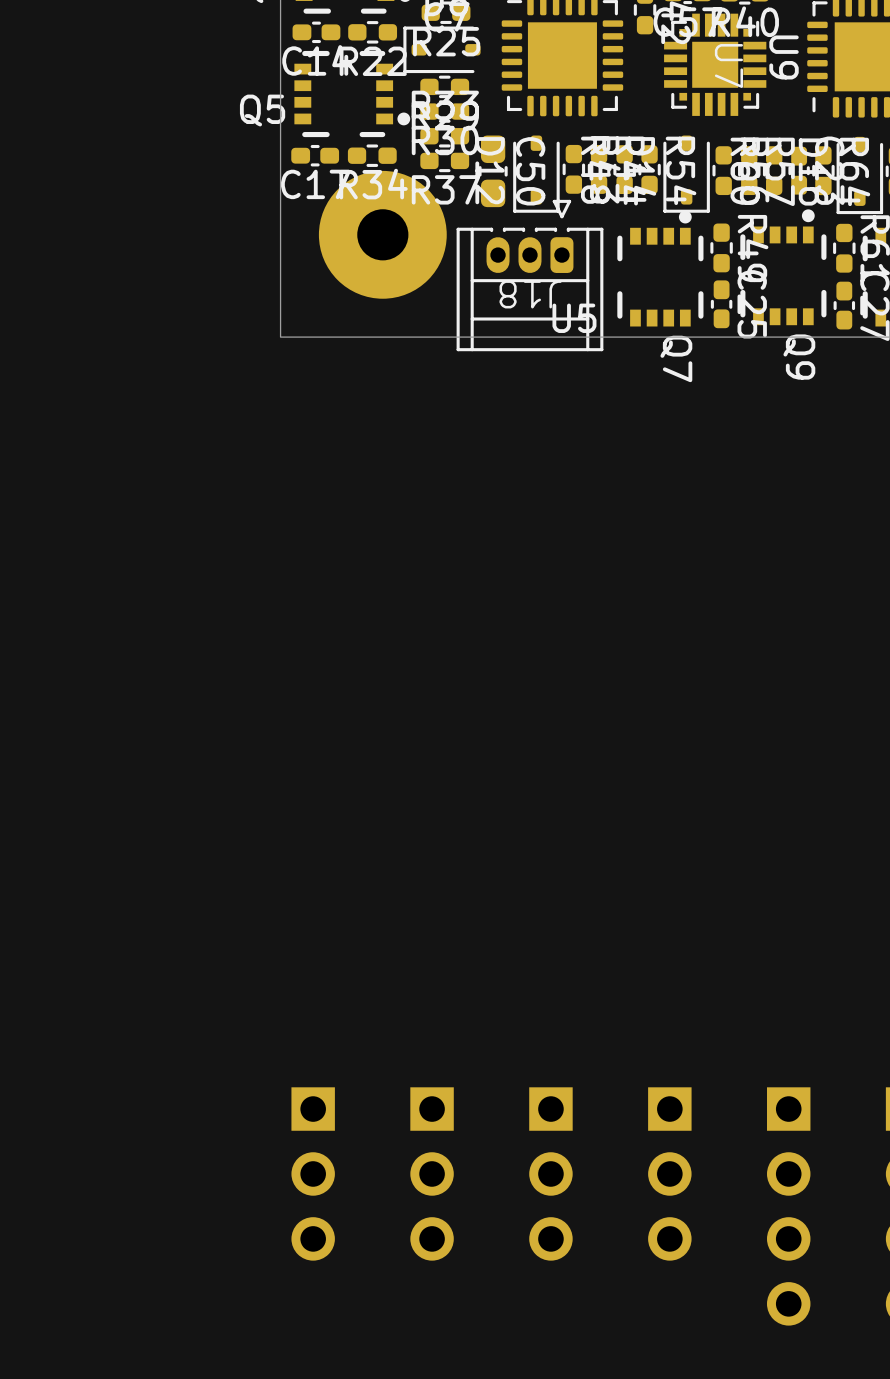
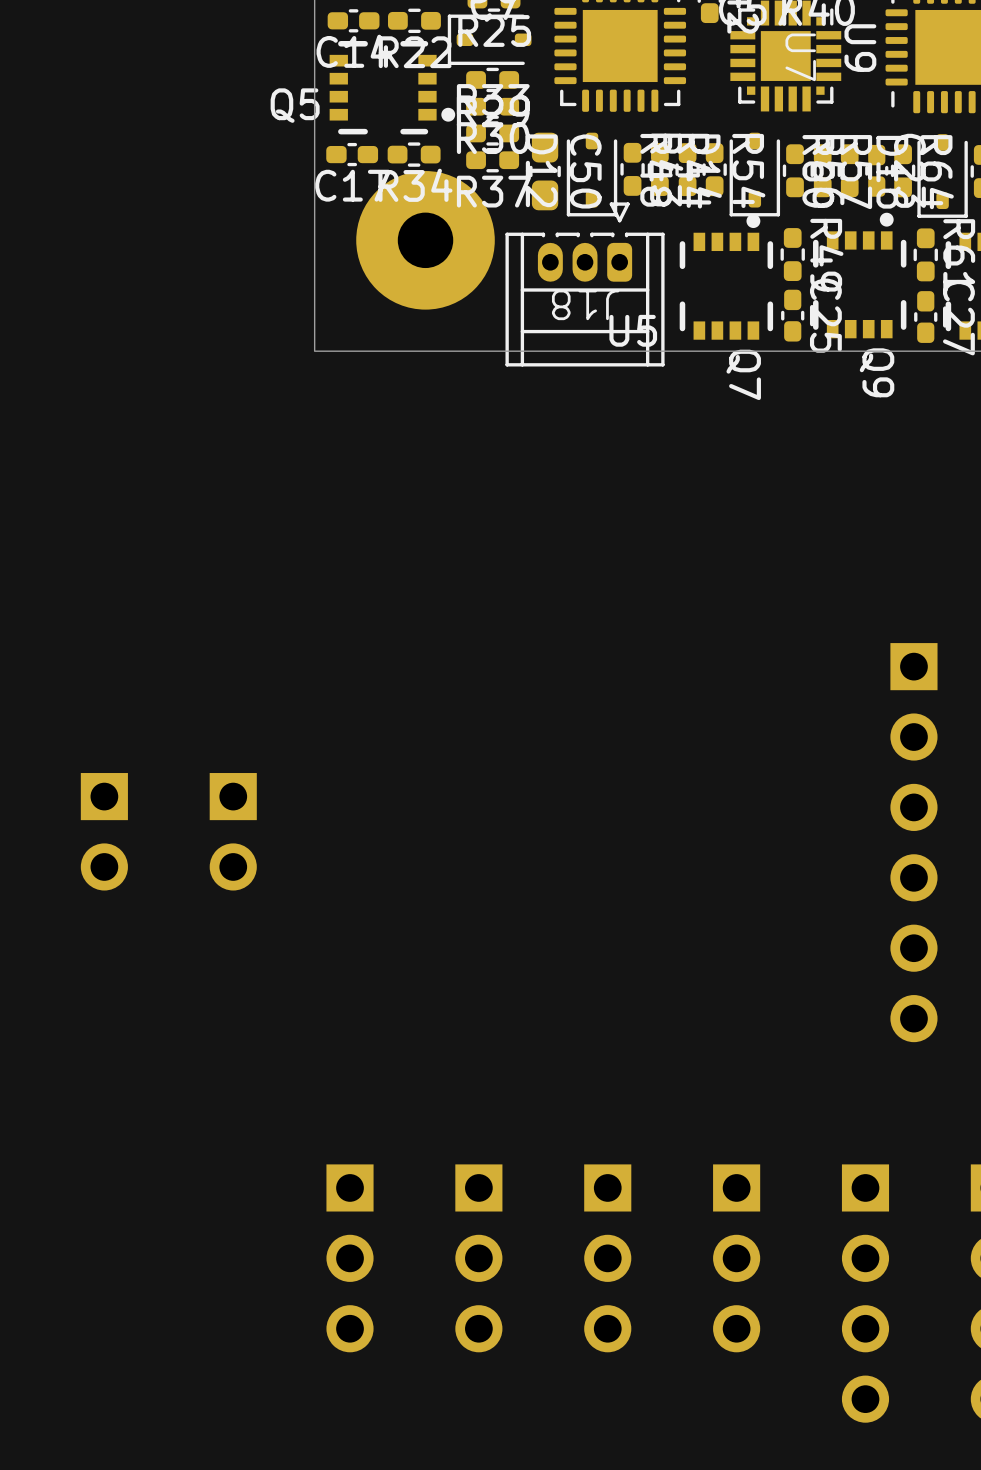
part: none -> (104, 831)
part: none -> (233, 831)
part: none -> (913, 842)

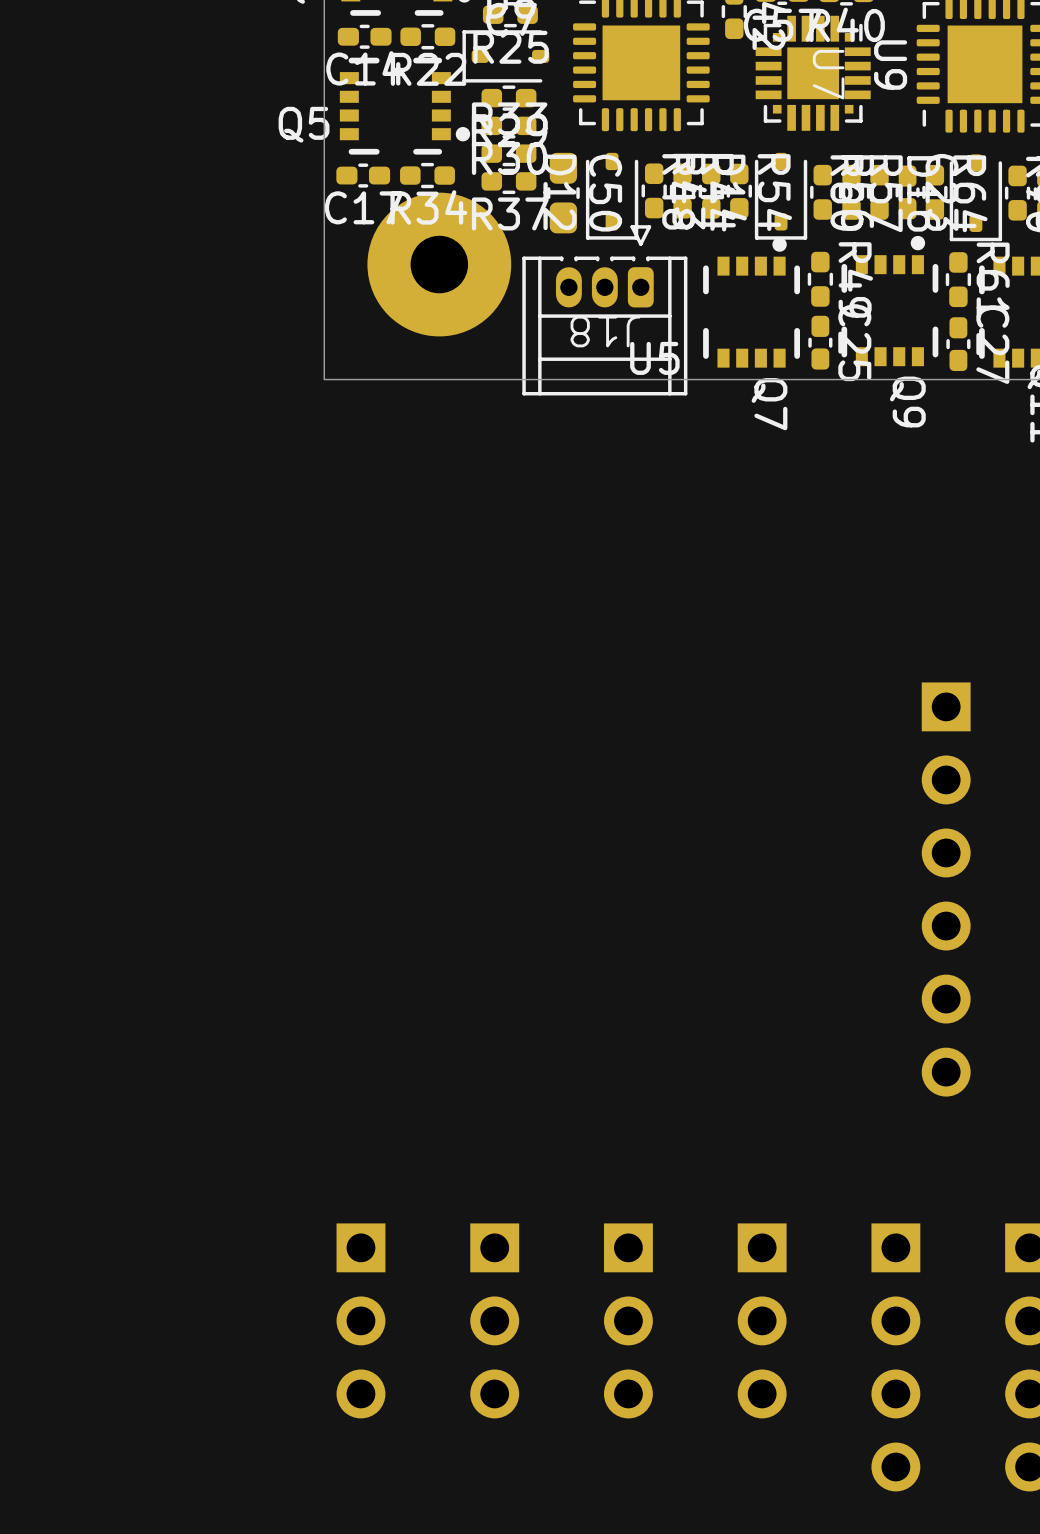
part: (104, 831) -> none
part: (233, 831) -> none

